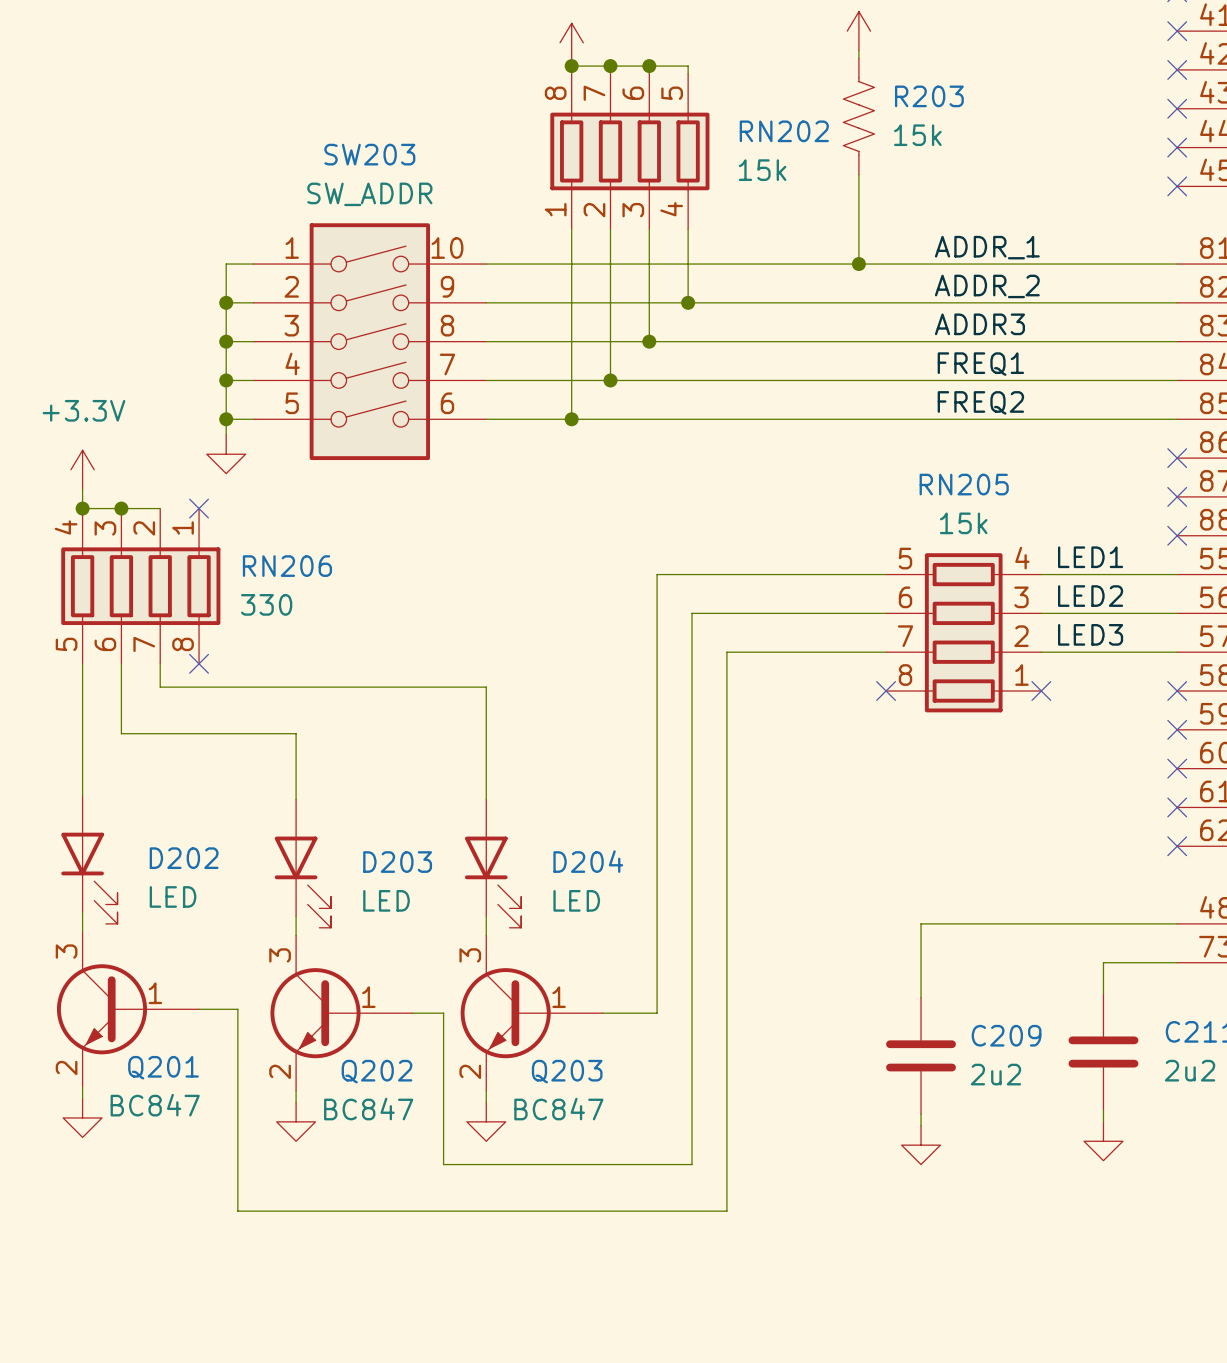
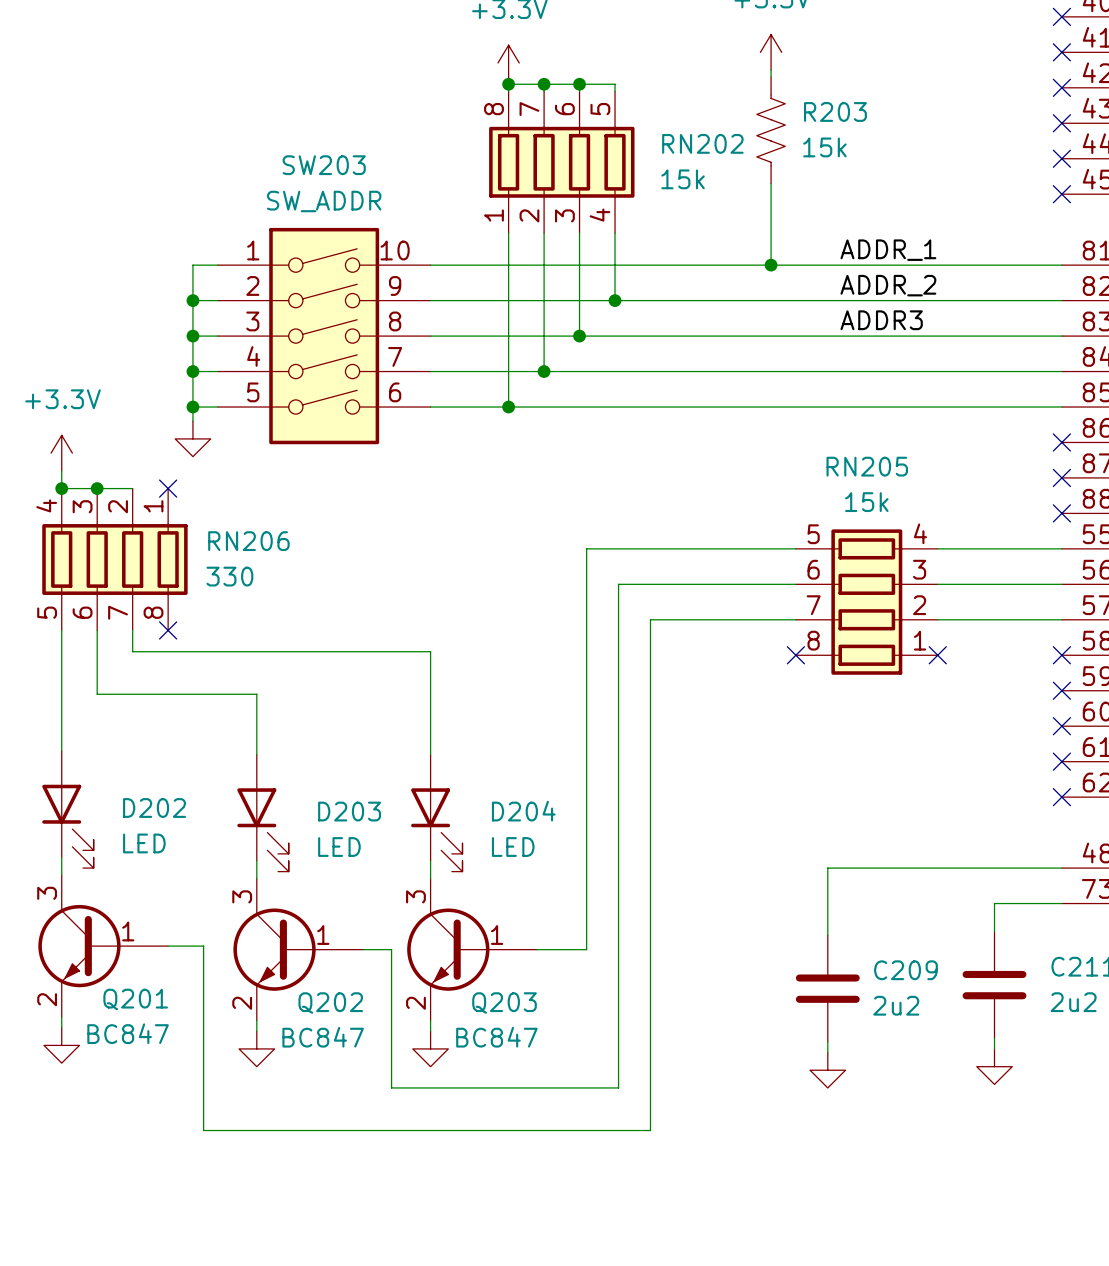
label: FREQ1 (980, 364) -> none
label: FREQ2 (980, 402) -> none
label: LED1 (1090, 557) -> none
label: LED2 (1090, 596) -> none
label: LED3 (1090, 634) -> none

